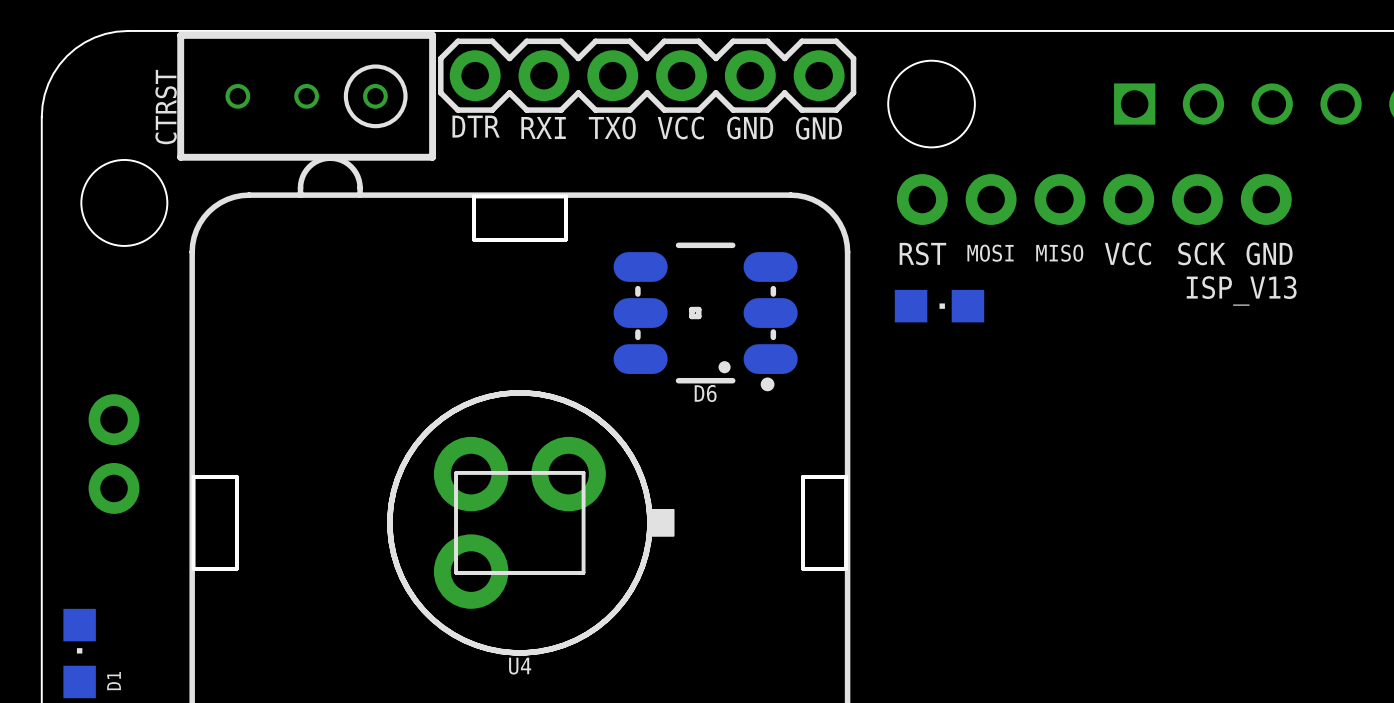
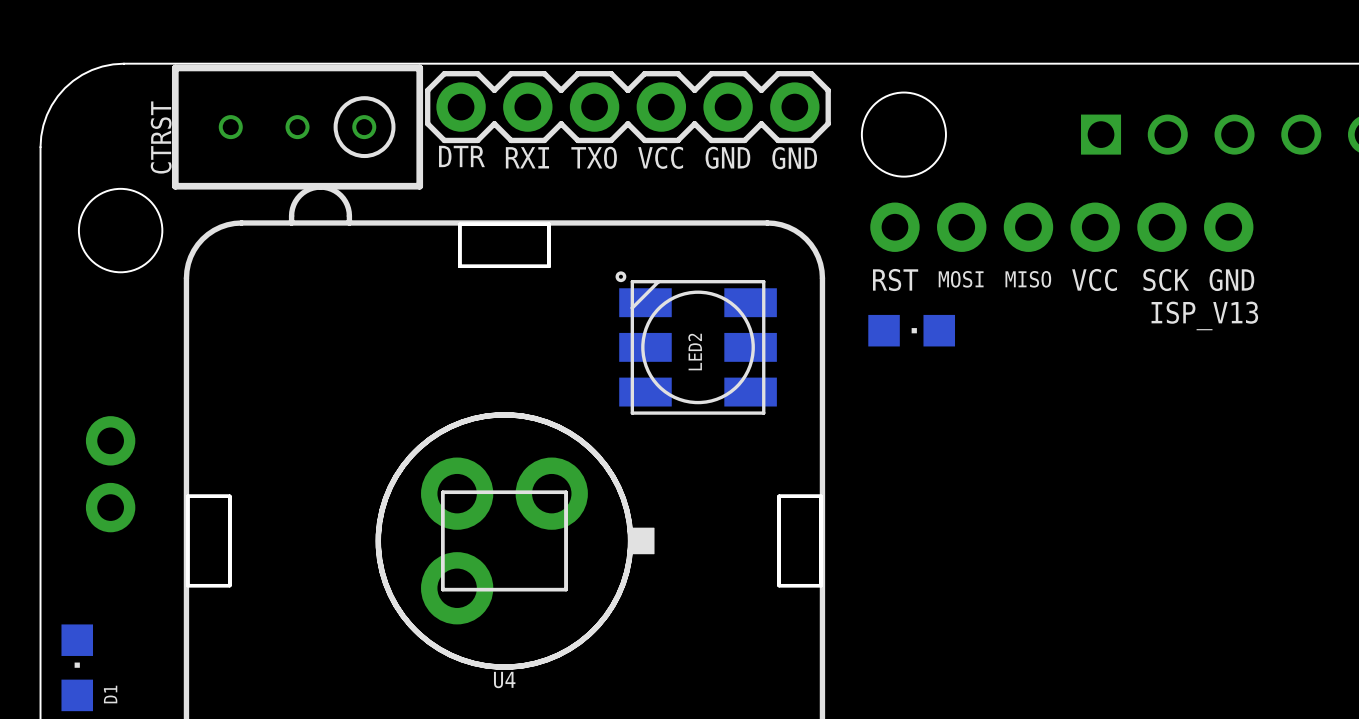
D6: (705, 316) -> none
LED2: none -> (696, 343)

